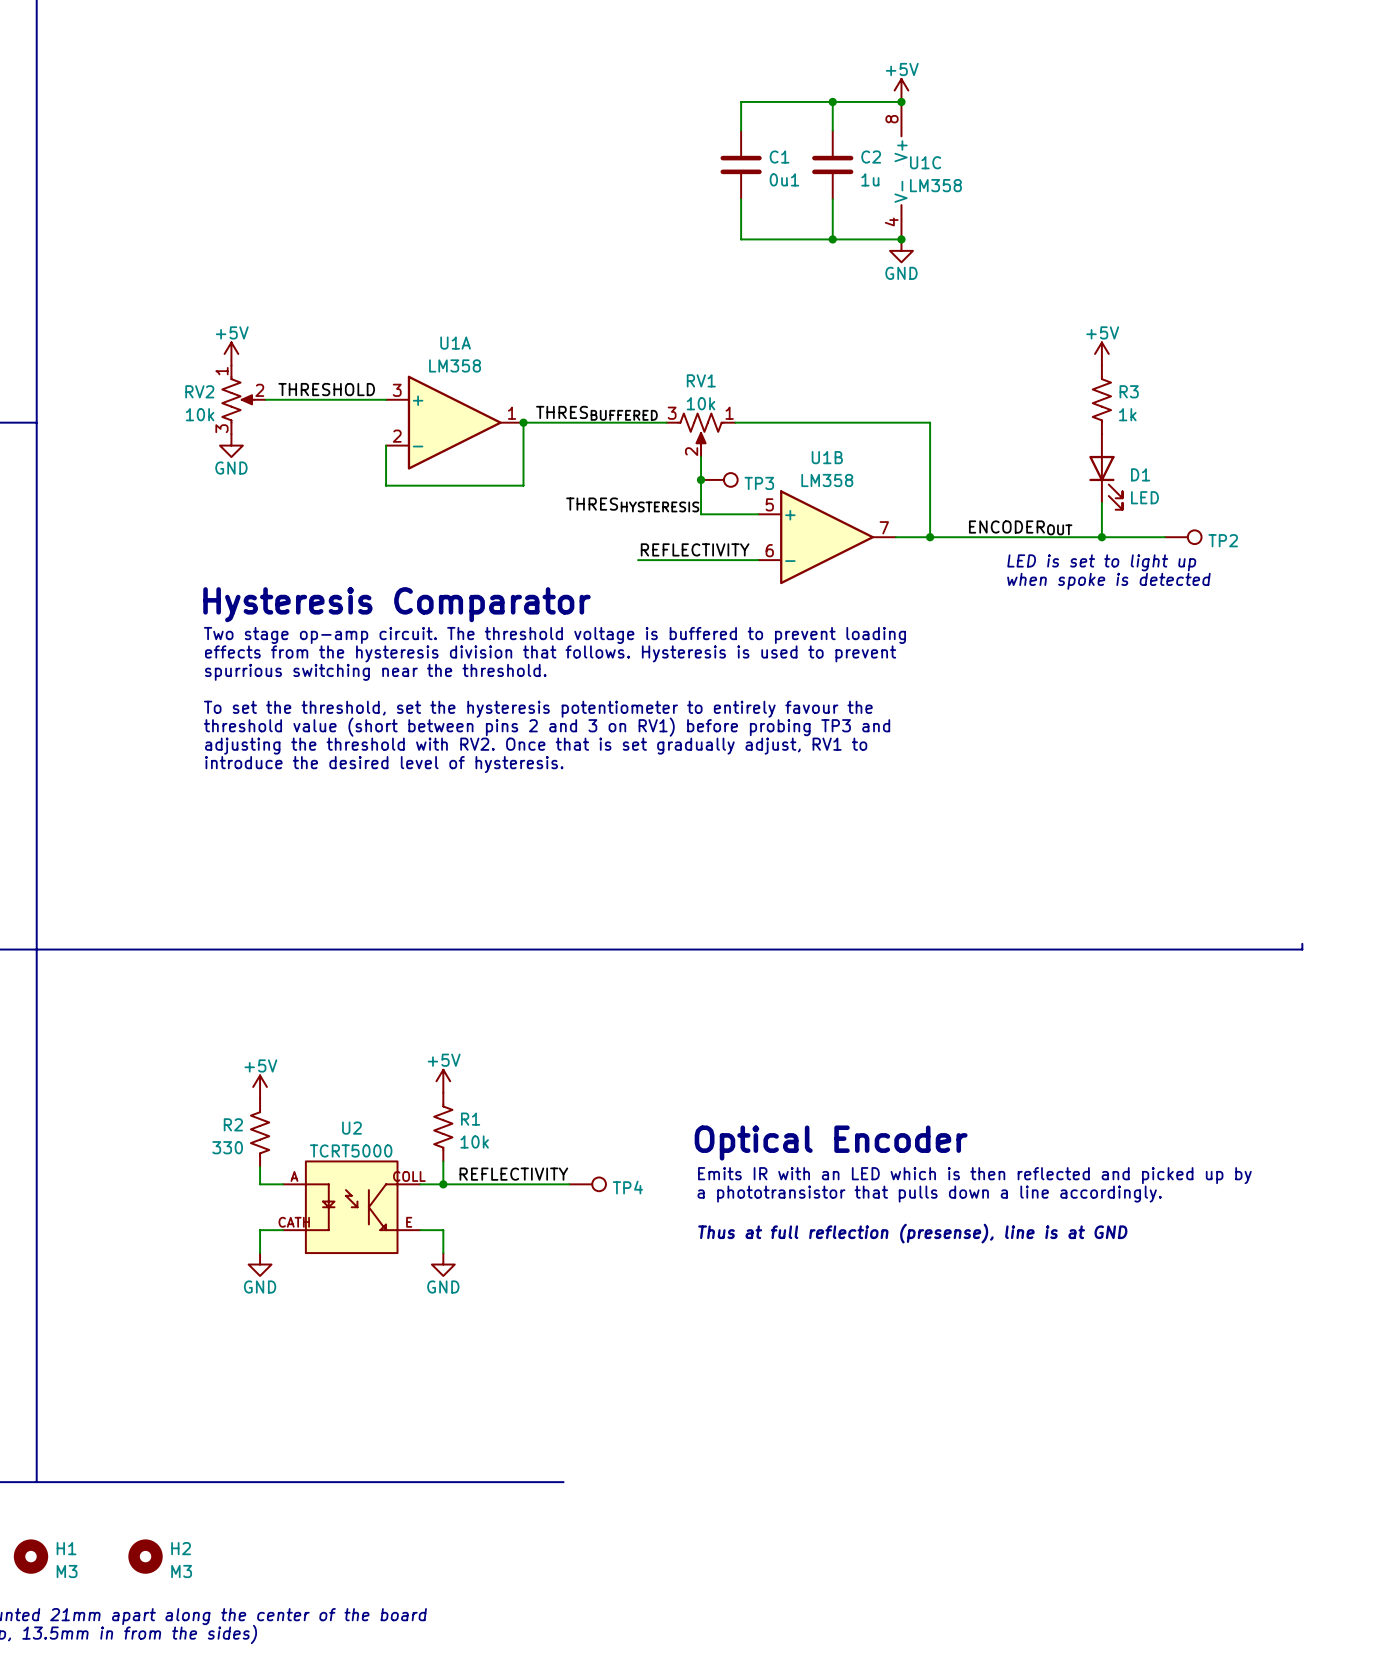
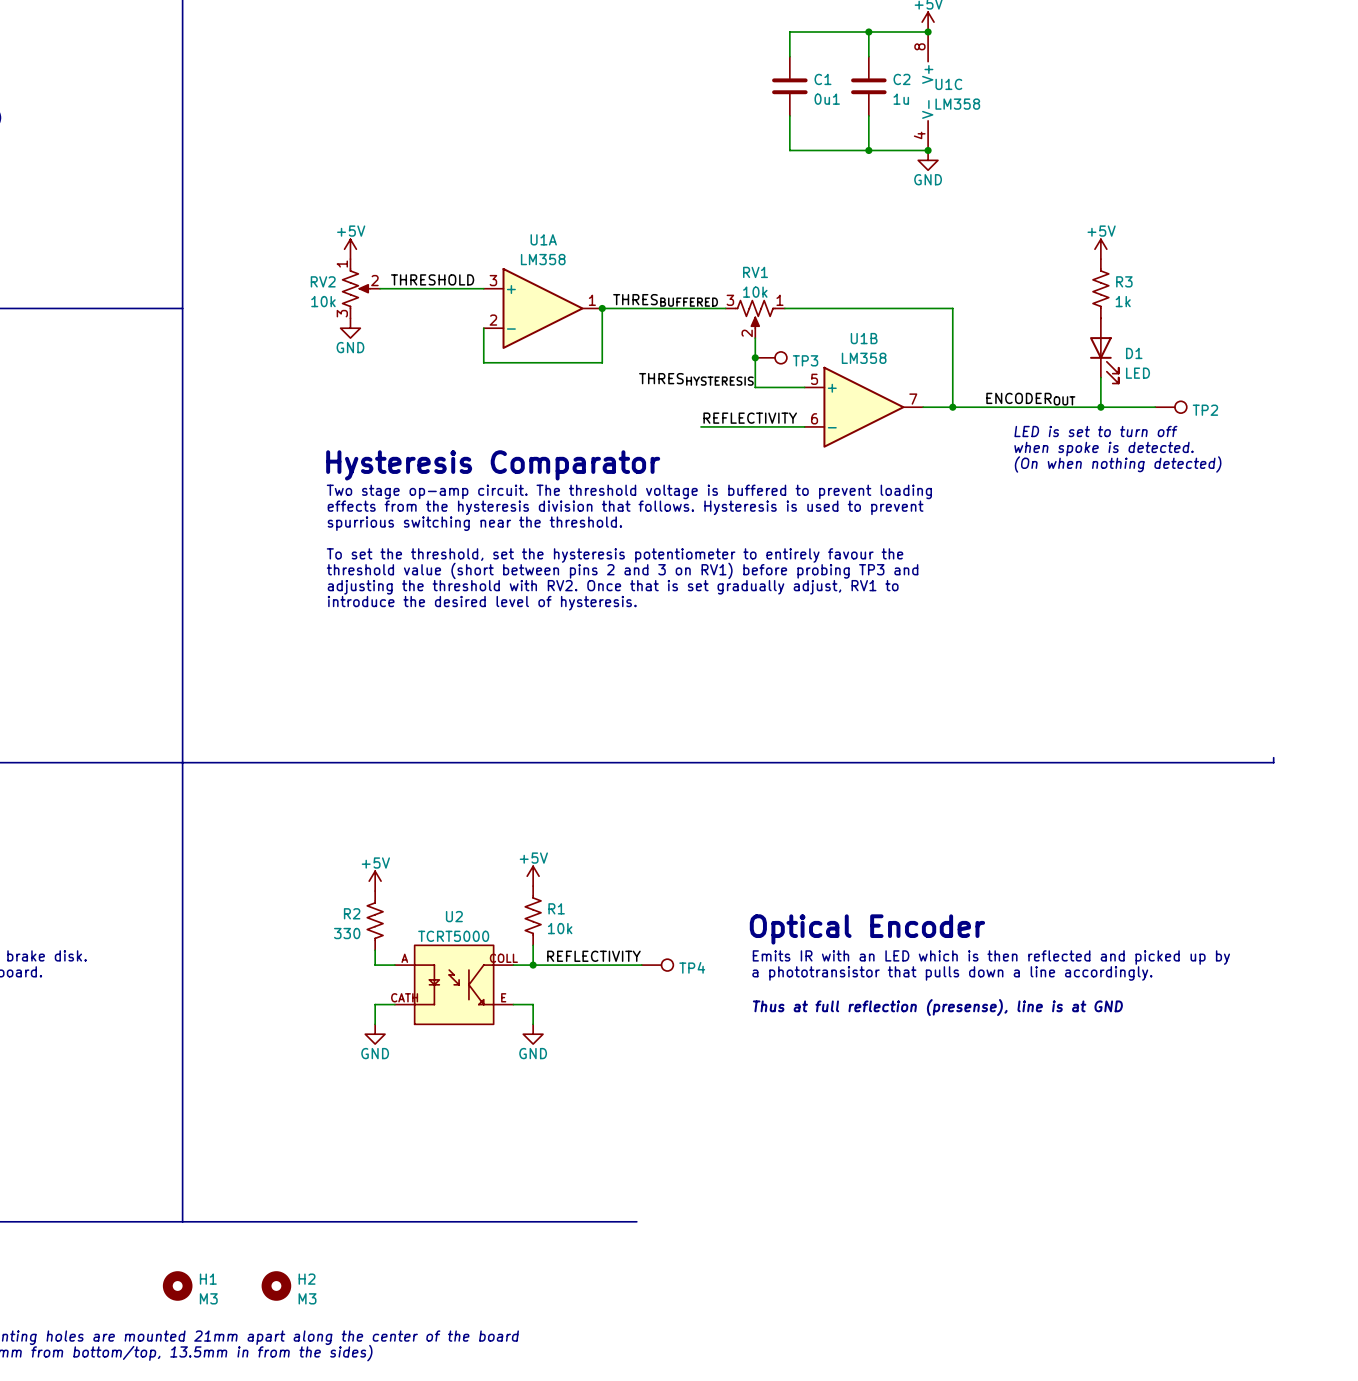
text: LED is set to light up (1101, 562) -> LED is set to turn off (1095, 431)
text: when spoke is detected (1108, 581) -> when spoke is detected. (1103, 449)
text: none -> (On when nothing detected) (1118, 464)

